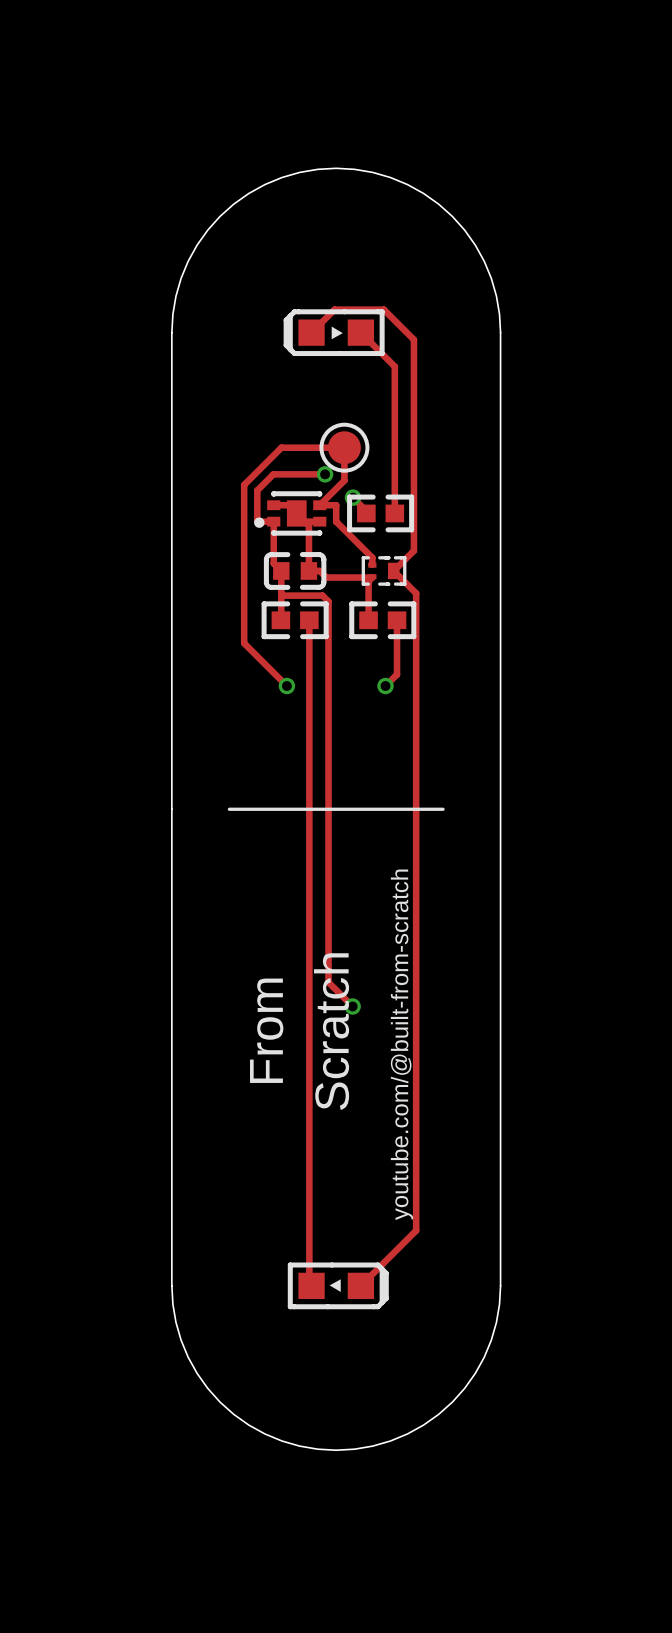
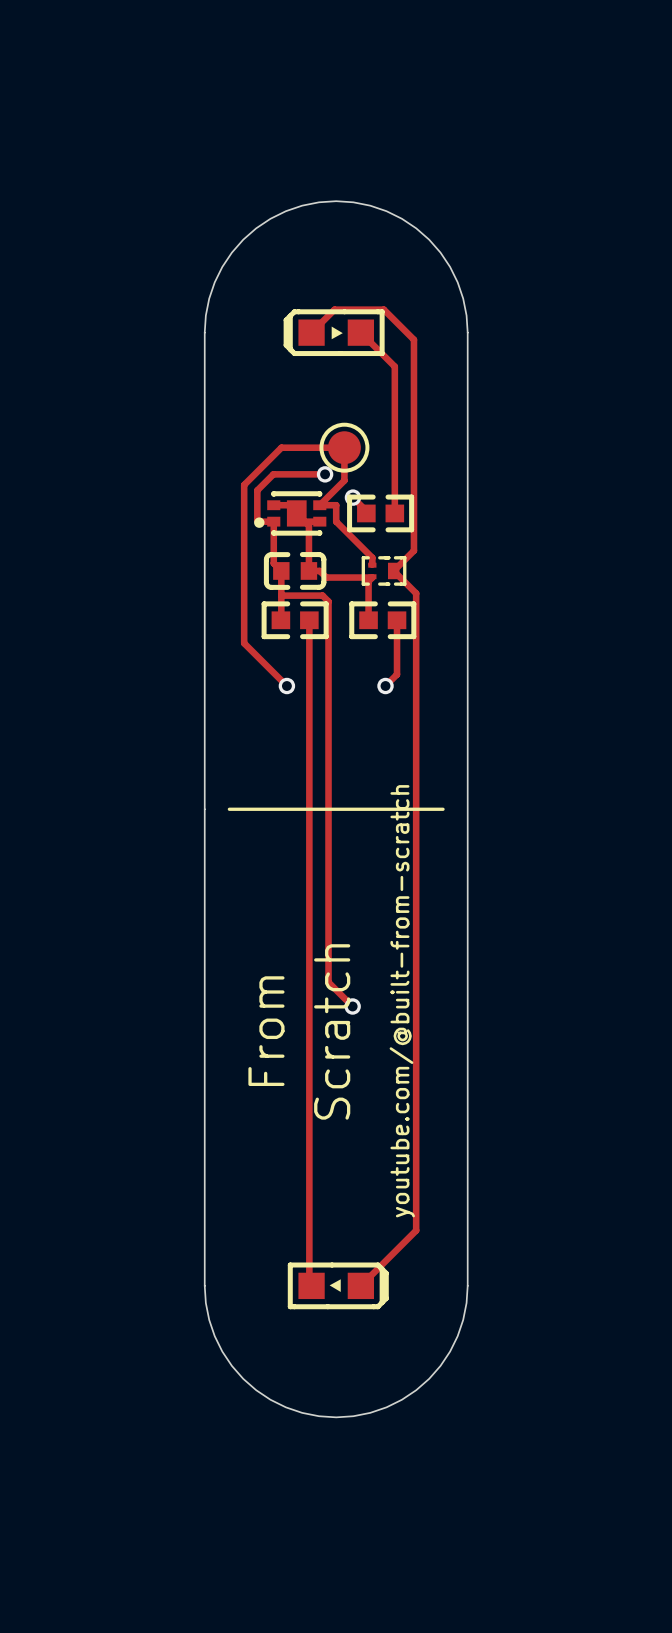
board edge: (171, 332) (171, 1285) (175, 1322) (188, 1357) (207, 1388) (233, 1414) (248, 1425) (281, 1441) (317, 1449) (354, 1449) (372, 1446) (390, 1441) (423, 1425) (452, 1402) (464, 1388) (484, 1357) (496, 1322) (499, 1304) (500, 332) (496, 296) (484, 261) (475, 245) (464, 230) (438, 204) (407, 184) (372, 172) (336, 168) (317, 169) (299, 172) (264, 184) (248, 193) (220, 216) (207, 230) (188, 261) (175, 296) (171, 332) -> (204, 332) (205, 1303) (214, 1336) (222, 1351) (231, 1365) (256, 1390) (285, 1407) (302, 1412) (319, 1416) (353, 1416) (386, 1407) (416, 1390) (429, 1378) (450, 1351) (457, 1336) (466, 1303) (466, 315) (463, 298) (450, 266) (429, 239) (416, 228) (401, 218) (370, 205) (353, 202) (319, 202) (285, 211) (270, 218) (243, 239) (222, 266) (214, 282) (205, 315) (204, 332)

